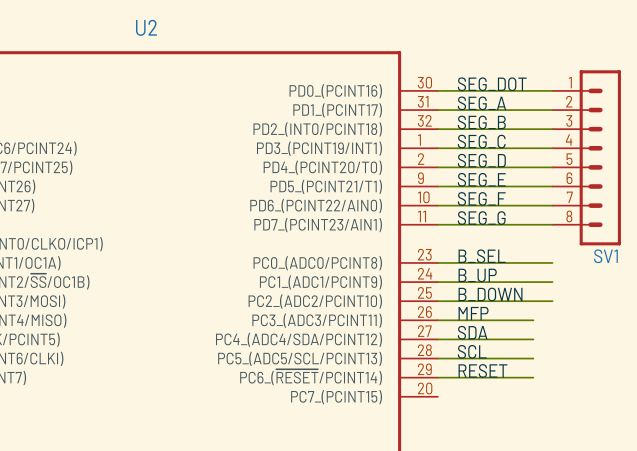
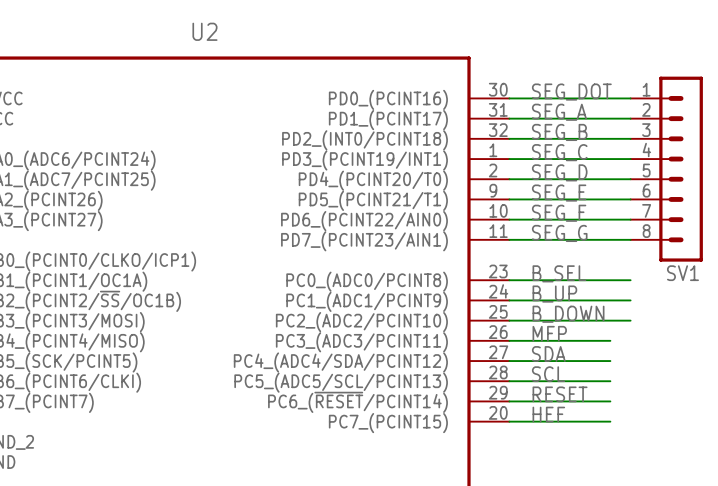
label: none -> HEF (548, 414)
wire: none -> (509, 421) (610, 421)

